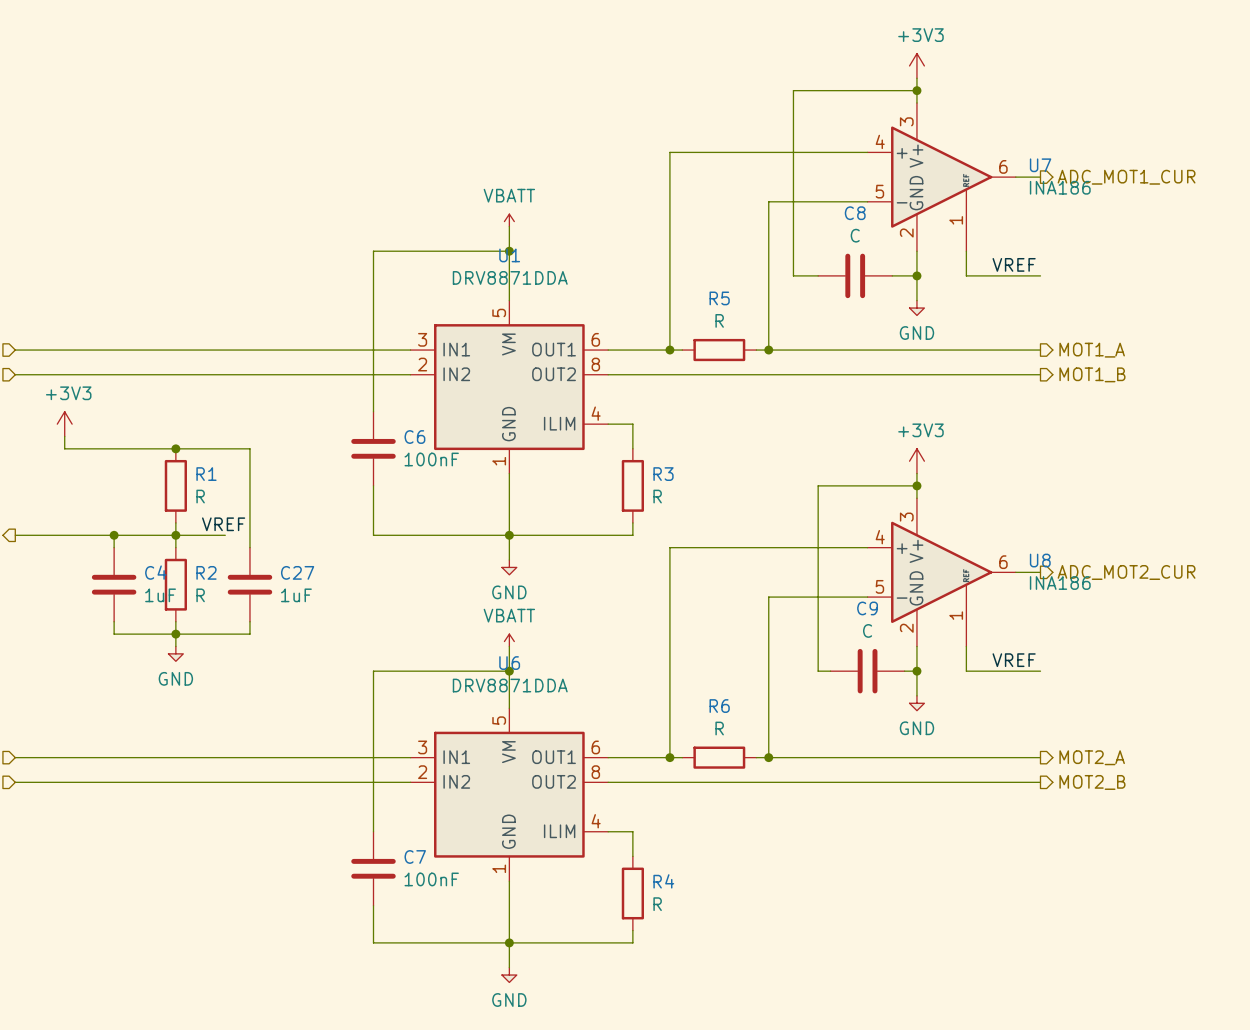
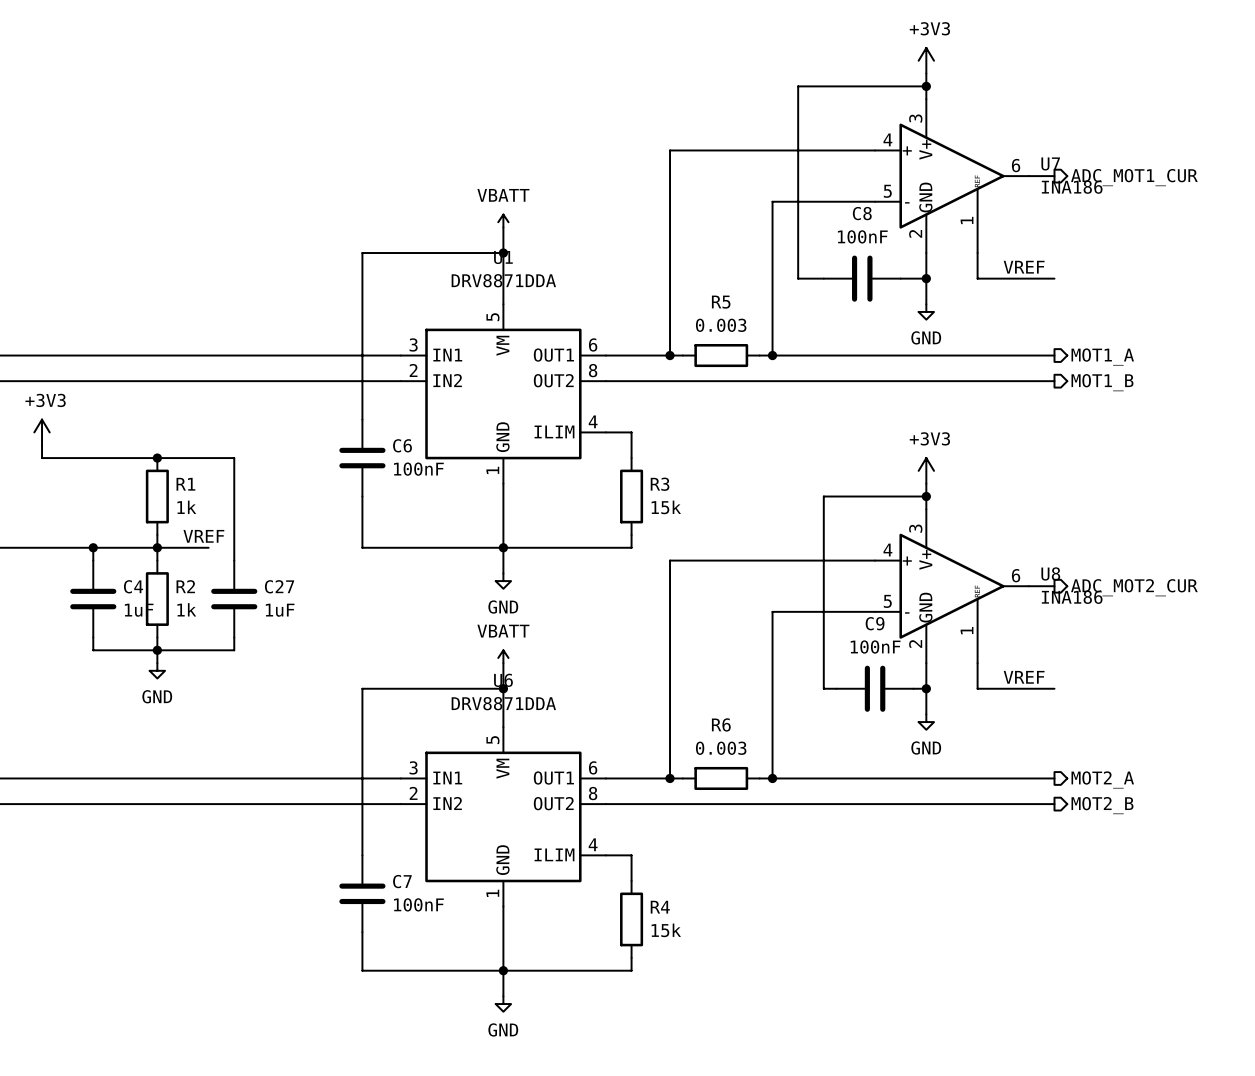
C8 value: C (855, 235) -> 100nF (862, 236)
R5 value: R (719, 320) -> 0.003 (721, 325)
R1 value: R (200, 496) -> 1k (186, 507)
R3 value: R (657, 496) -> 15k (666, 507)
R2 value: R (200, 595) -> 1k (186, 609)
C9 value: C (867, 630) -> 100nF (875, 647)
R6 value: R (719, 728) -> 0.003 (721, 748)
R4 value: R (657, 904) -> 15k (666, 930)

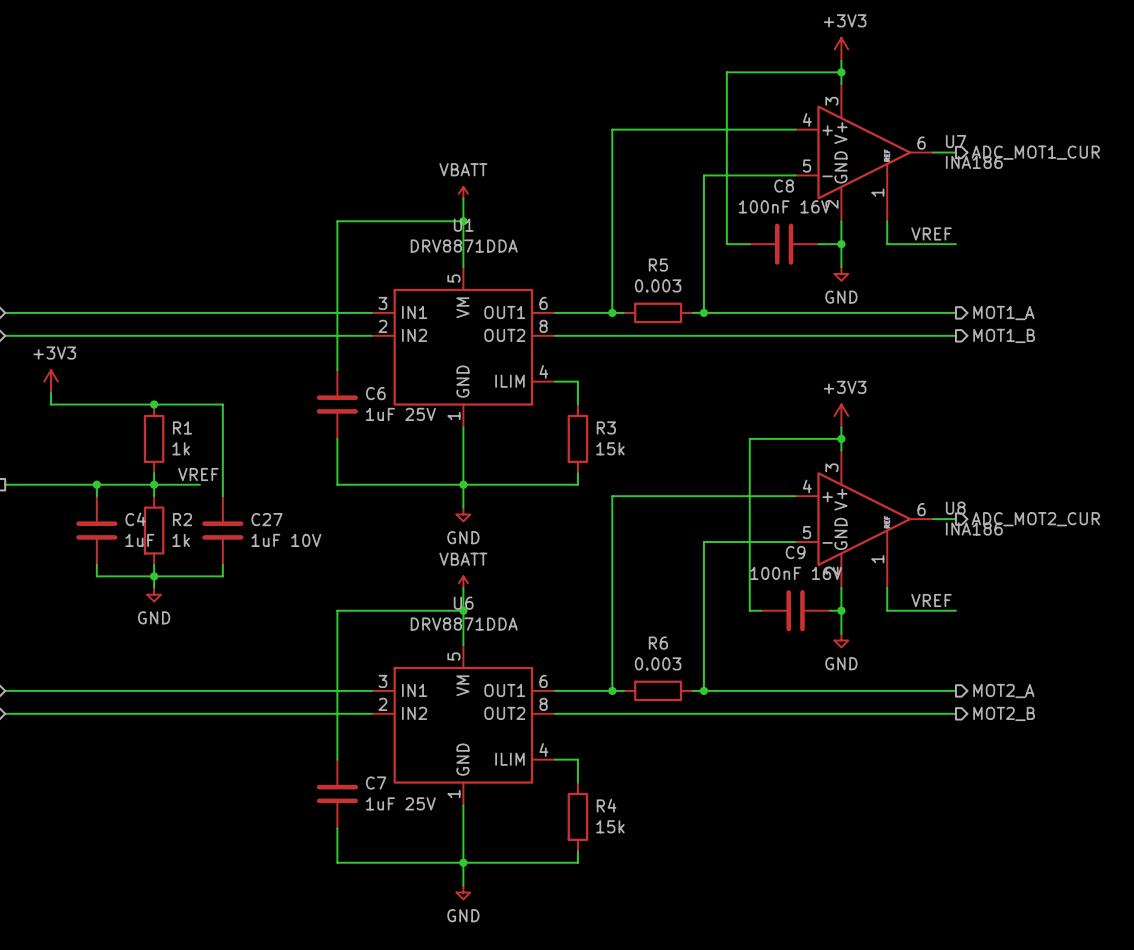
C8 value: 100nF (862, 236) -> 100nF 16V (784, 206)
C6 value: 100nF (418, 469) -> 1uF 25V (400, 414)
C27 value: 1uF (280, 610) -> 1uF 10V (286, 540)
C9 value: 100nF (875, 647) -> 100nF 16V (796, 573)
C7 value: 100nF (418, 904) -> 1uF 25V (400, 803)

